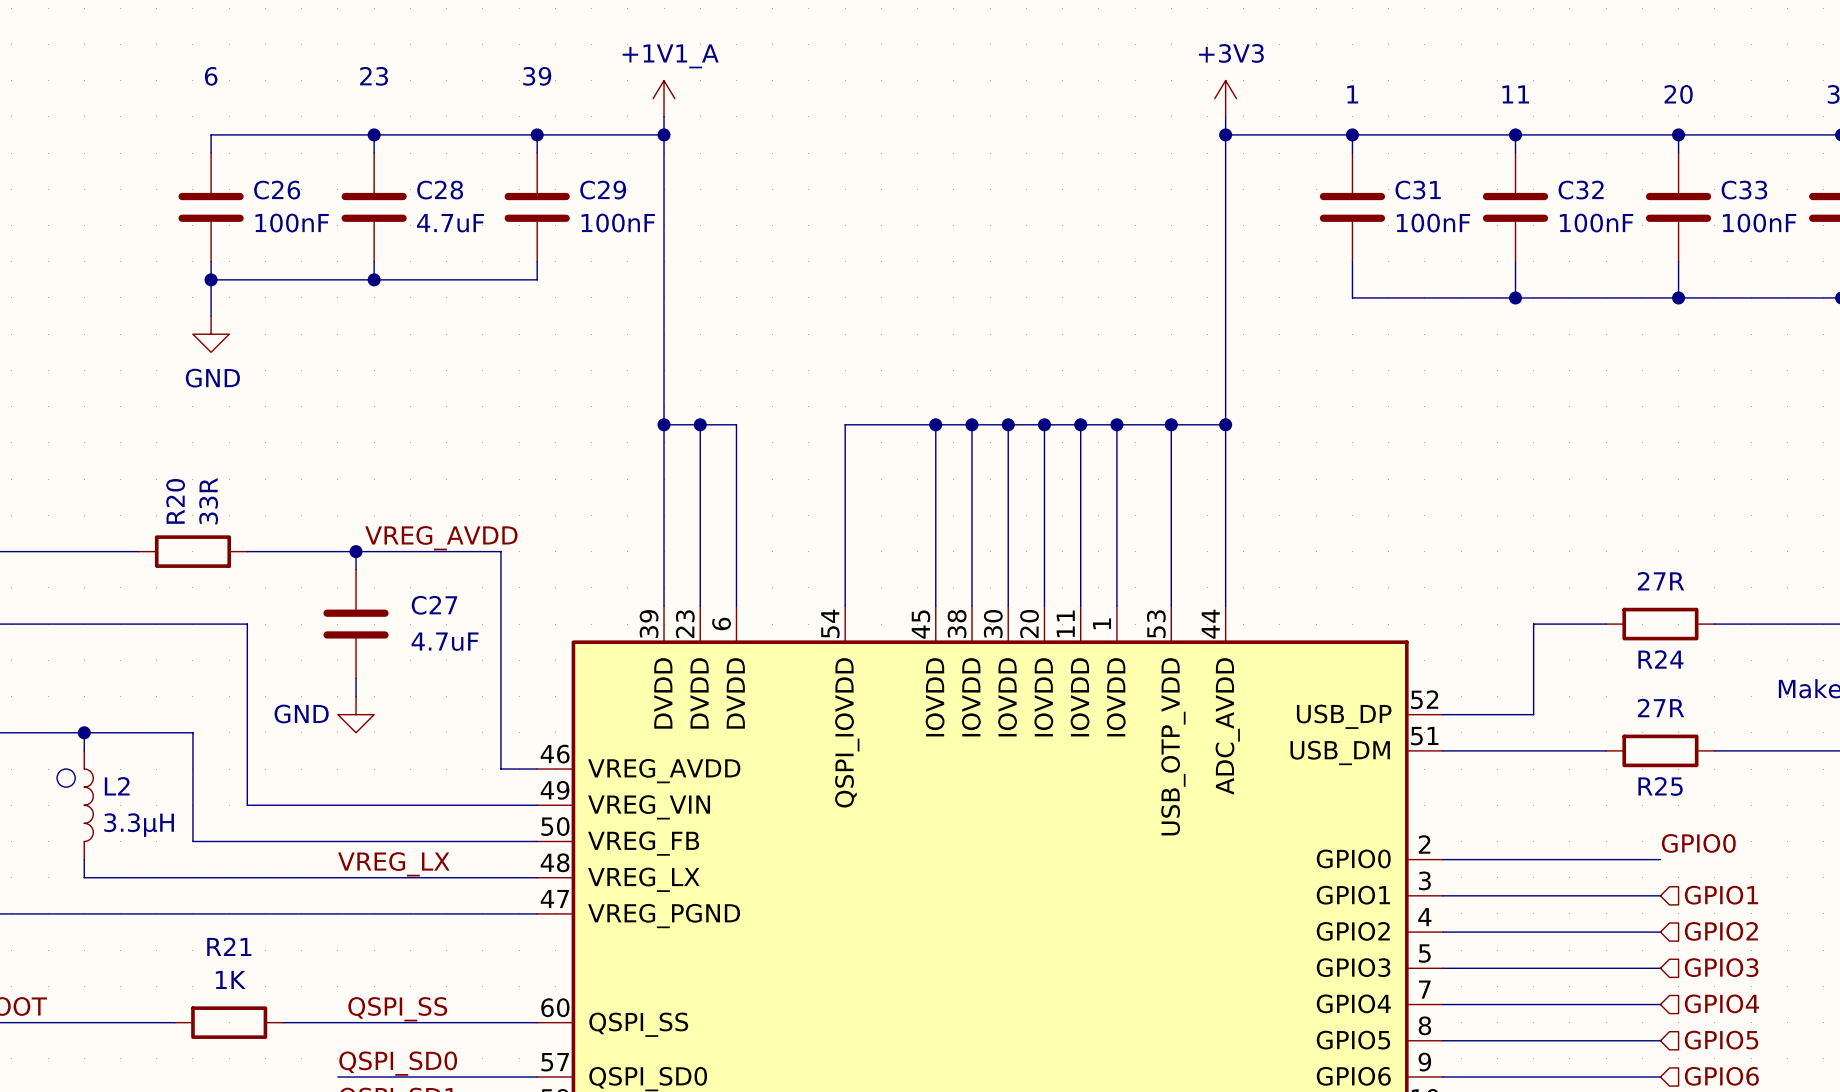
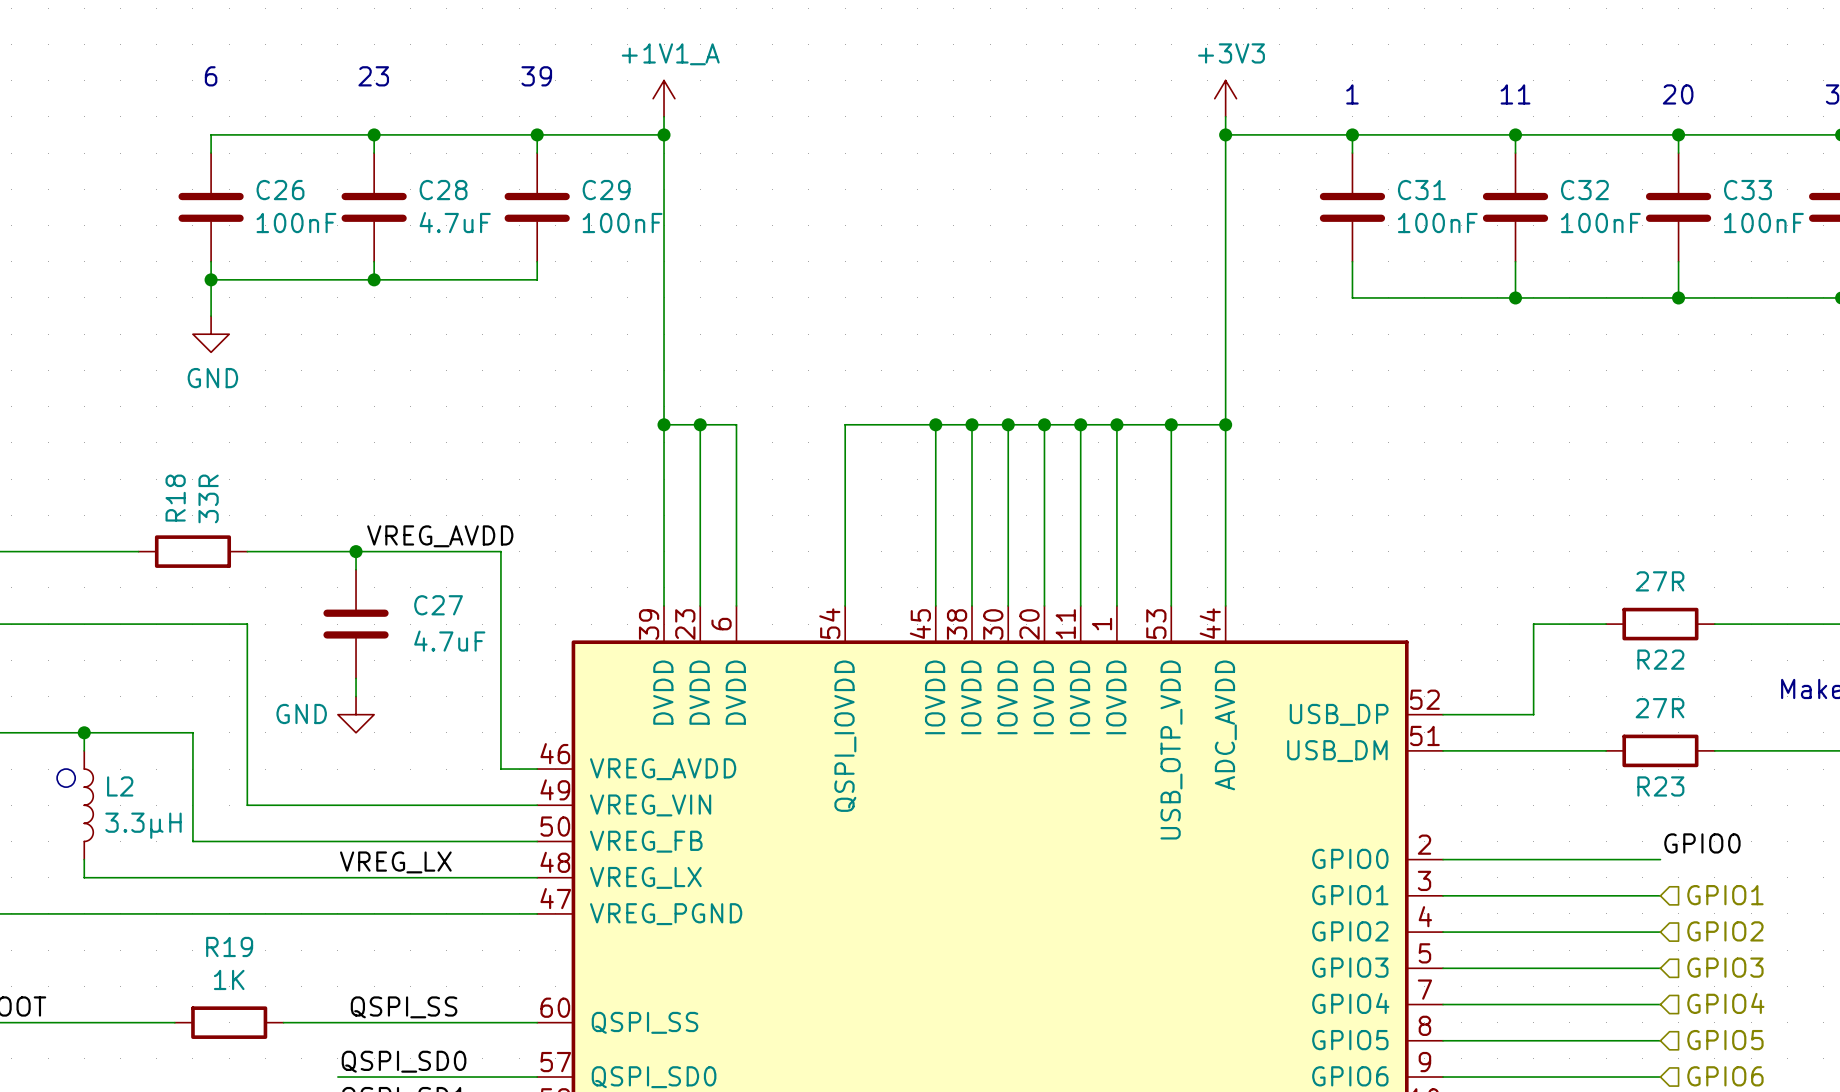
R20 name: R20 (175, 501) -> R18 (175, 498)
R24 name: R24 (1660, 659) -> R22 (1660, 659)
R25 name: R25 (1660, 786) -> R23 (1660, 786)
R21 name: R21 (229, 946) -> R19 (229, 946)

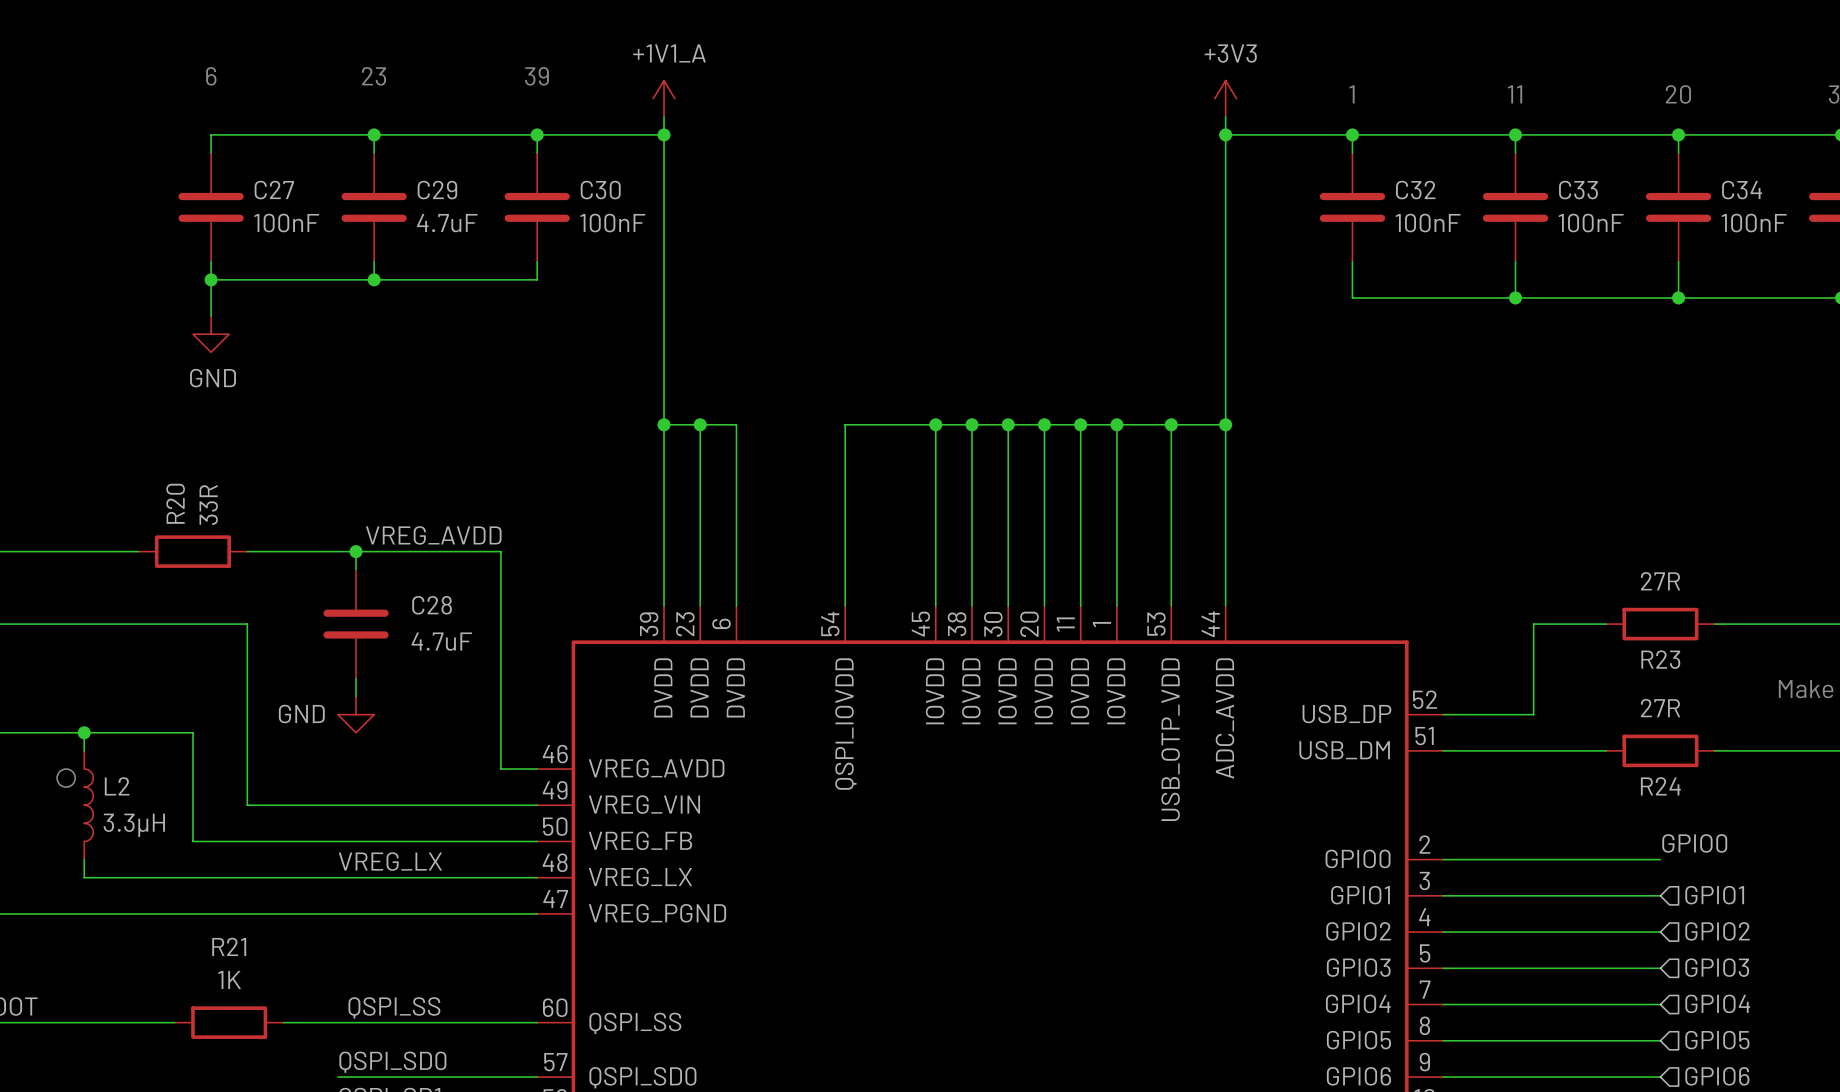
C26 name: C26 (280, 190) -> C27 (274, 190)
C28 name: C28 (443, 190) -> C29 (437, 190)
C29 name: C29 (606, 190) -> C30 (600, 190)
C31 name: C31 (1421, 190) -> C32 (1415, 190)
C32 name: C32 (1584, 190) -> C33 (1578, 190)
C33 name: C33 (1747, 190) -> C34 (1742, 190)
R18 name: R18 (175, 498) -> R20 (175, 503)
C27 name: C27 (438, 605) -> C28 (432, 605)
R22 name: R22 (1660, 659) -> R23 (1660, 659)
R23 name: R23 (1660, 786) -> R24 (1660, 786)
R19 name: R19 (229, 946) -> R21 (229, 946)

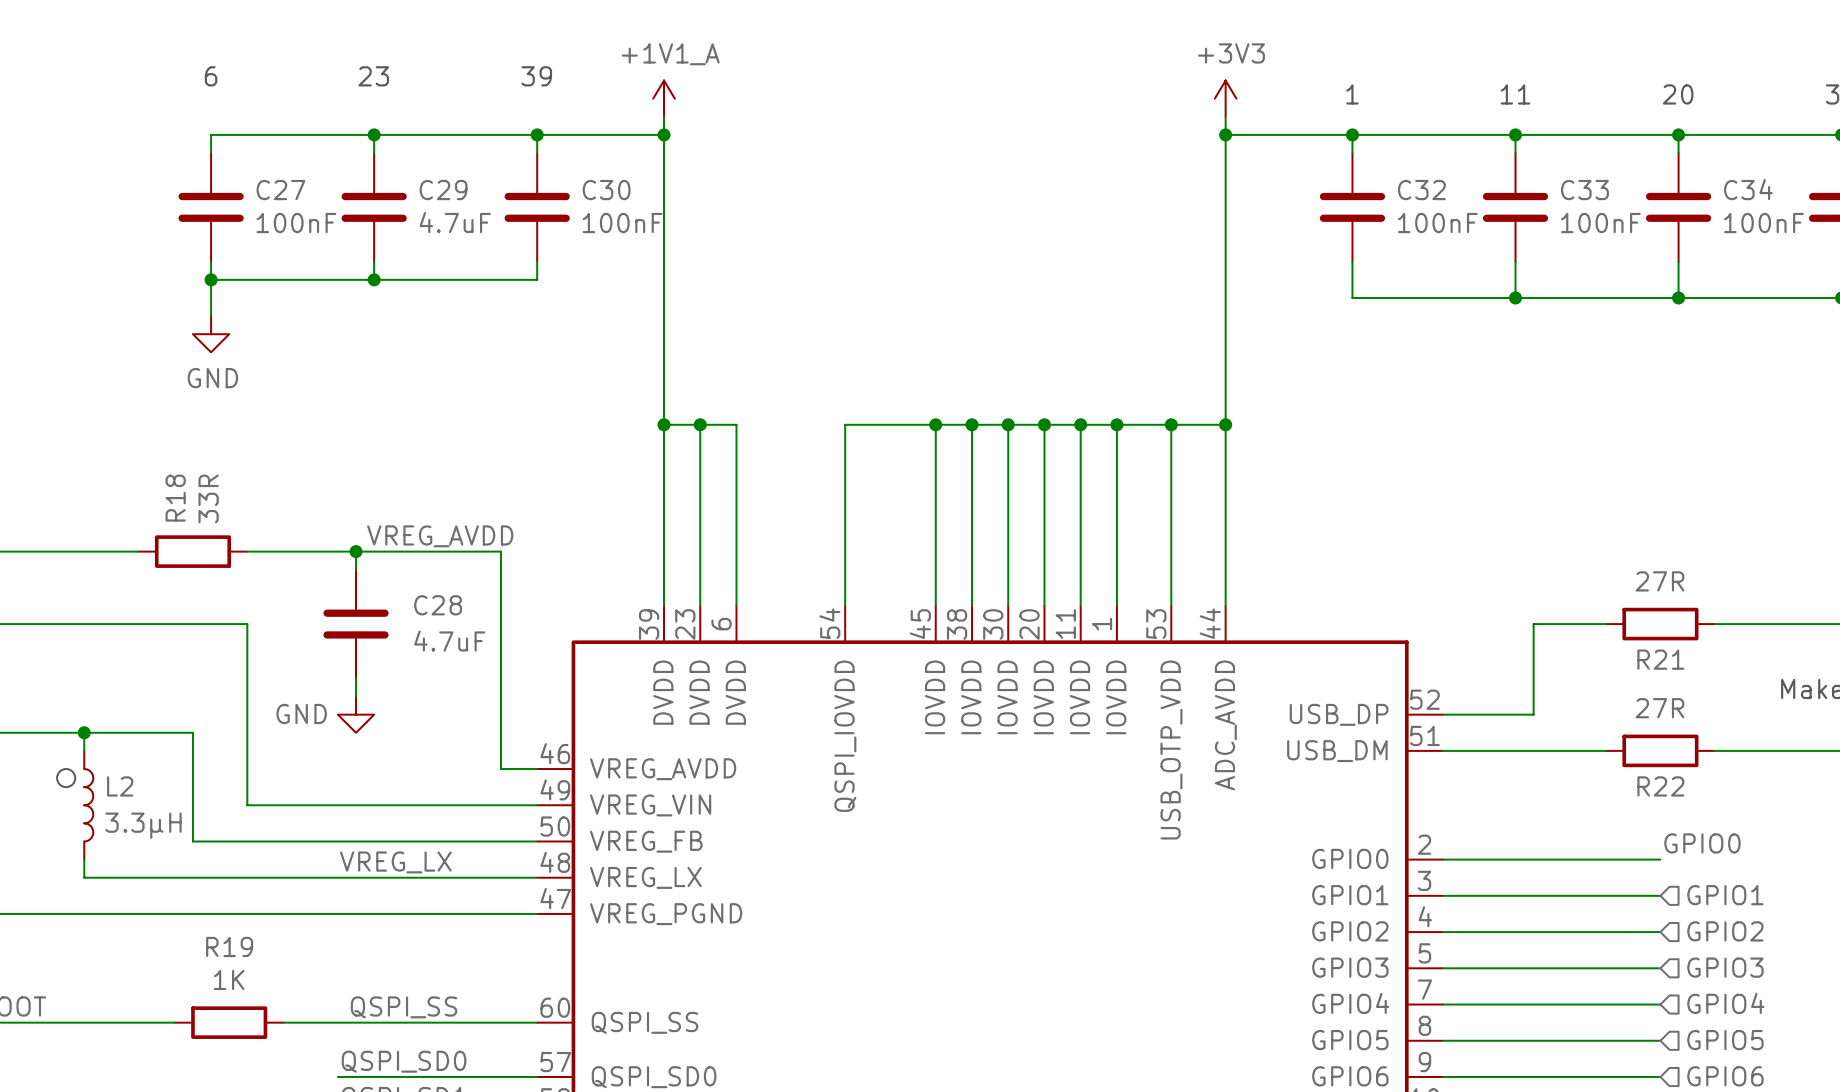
R20 name: R20 (175, 503) -> R18 (175, 498)
R23 name: R23 (1660, 659) -> R21 (1660, 659)
R24 name: R24 (1660, 786) -> R22 (1660, 786)
R21 name: R21 (229, 946) -> R19 (229, 946)

